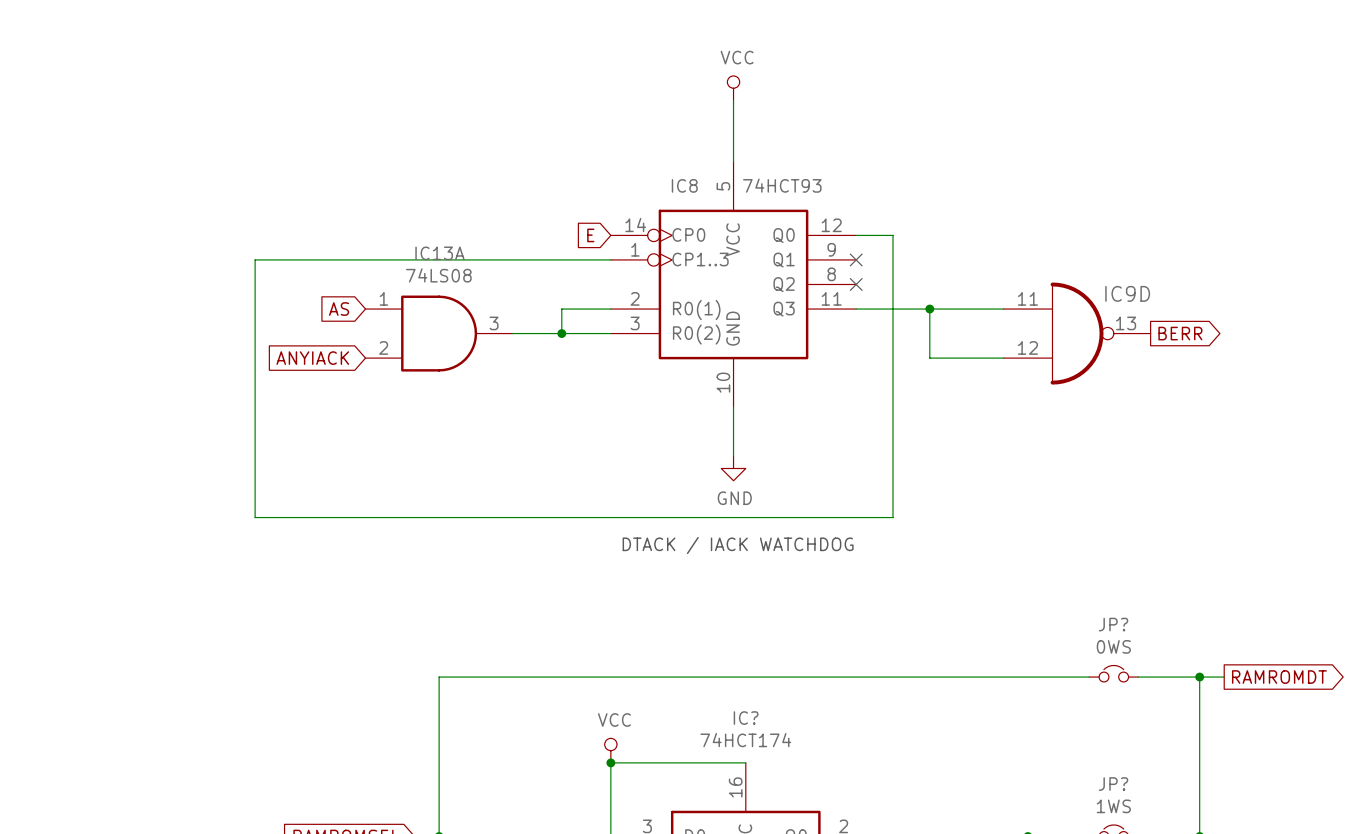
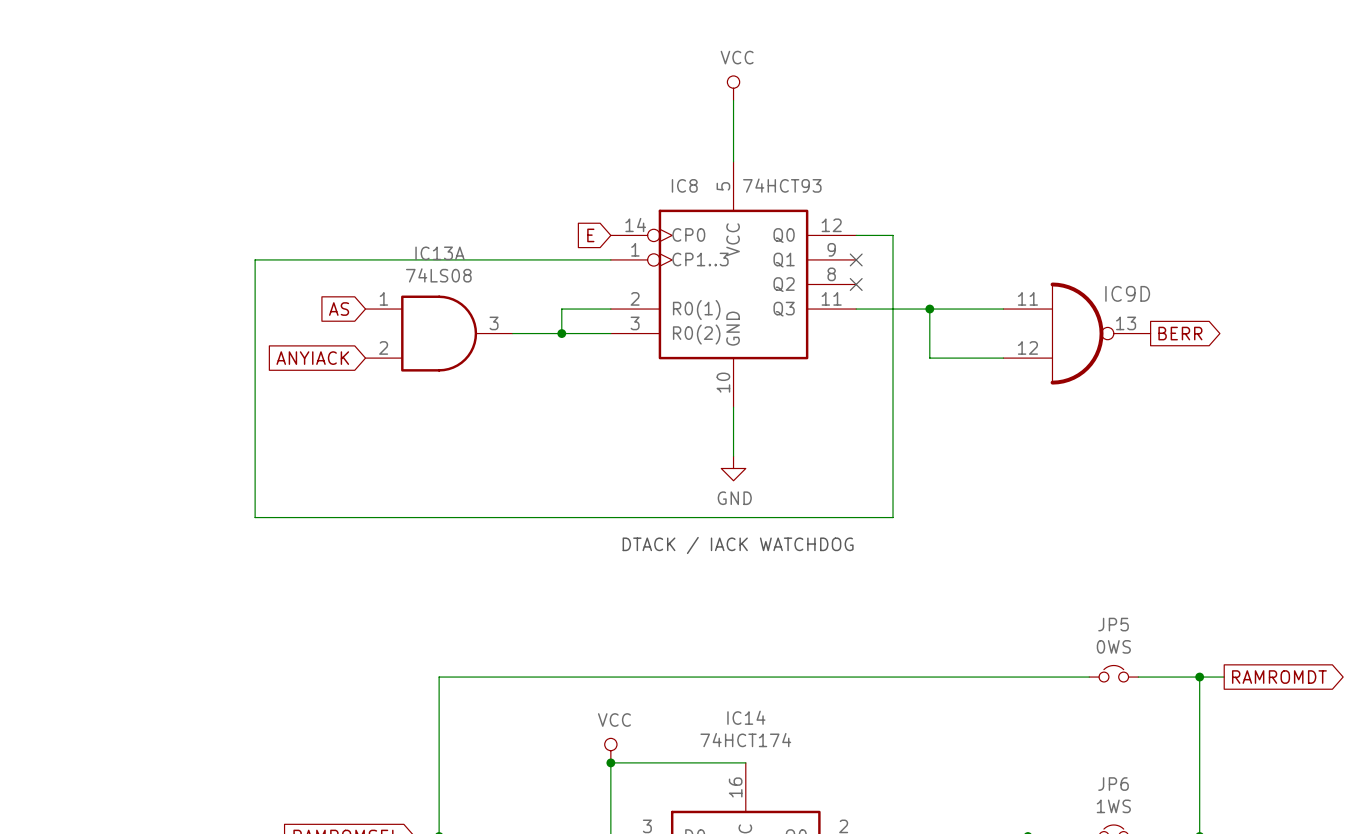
JP? name: JP? (1113, 624) -> JP5 (1113, 624)
IC? name: IC? (746, 718) -> IC14 (746, 717)
JP? name: JP? (1113, 784) -> JP6 (1113, 784)

